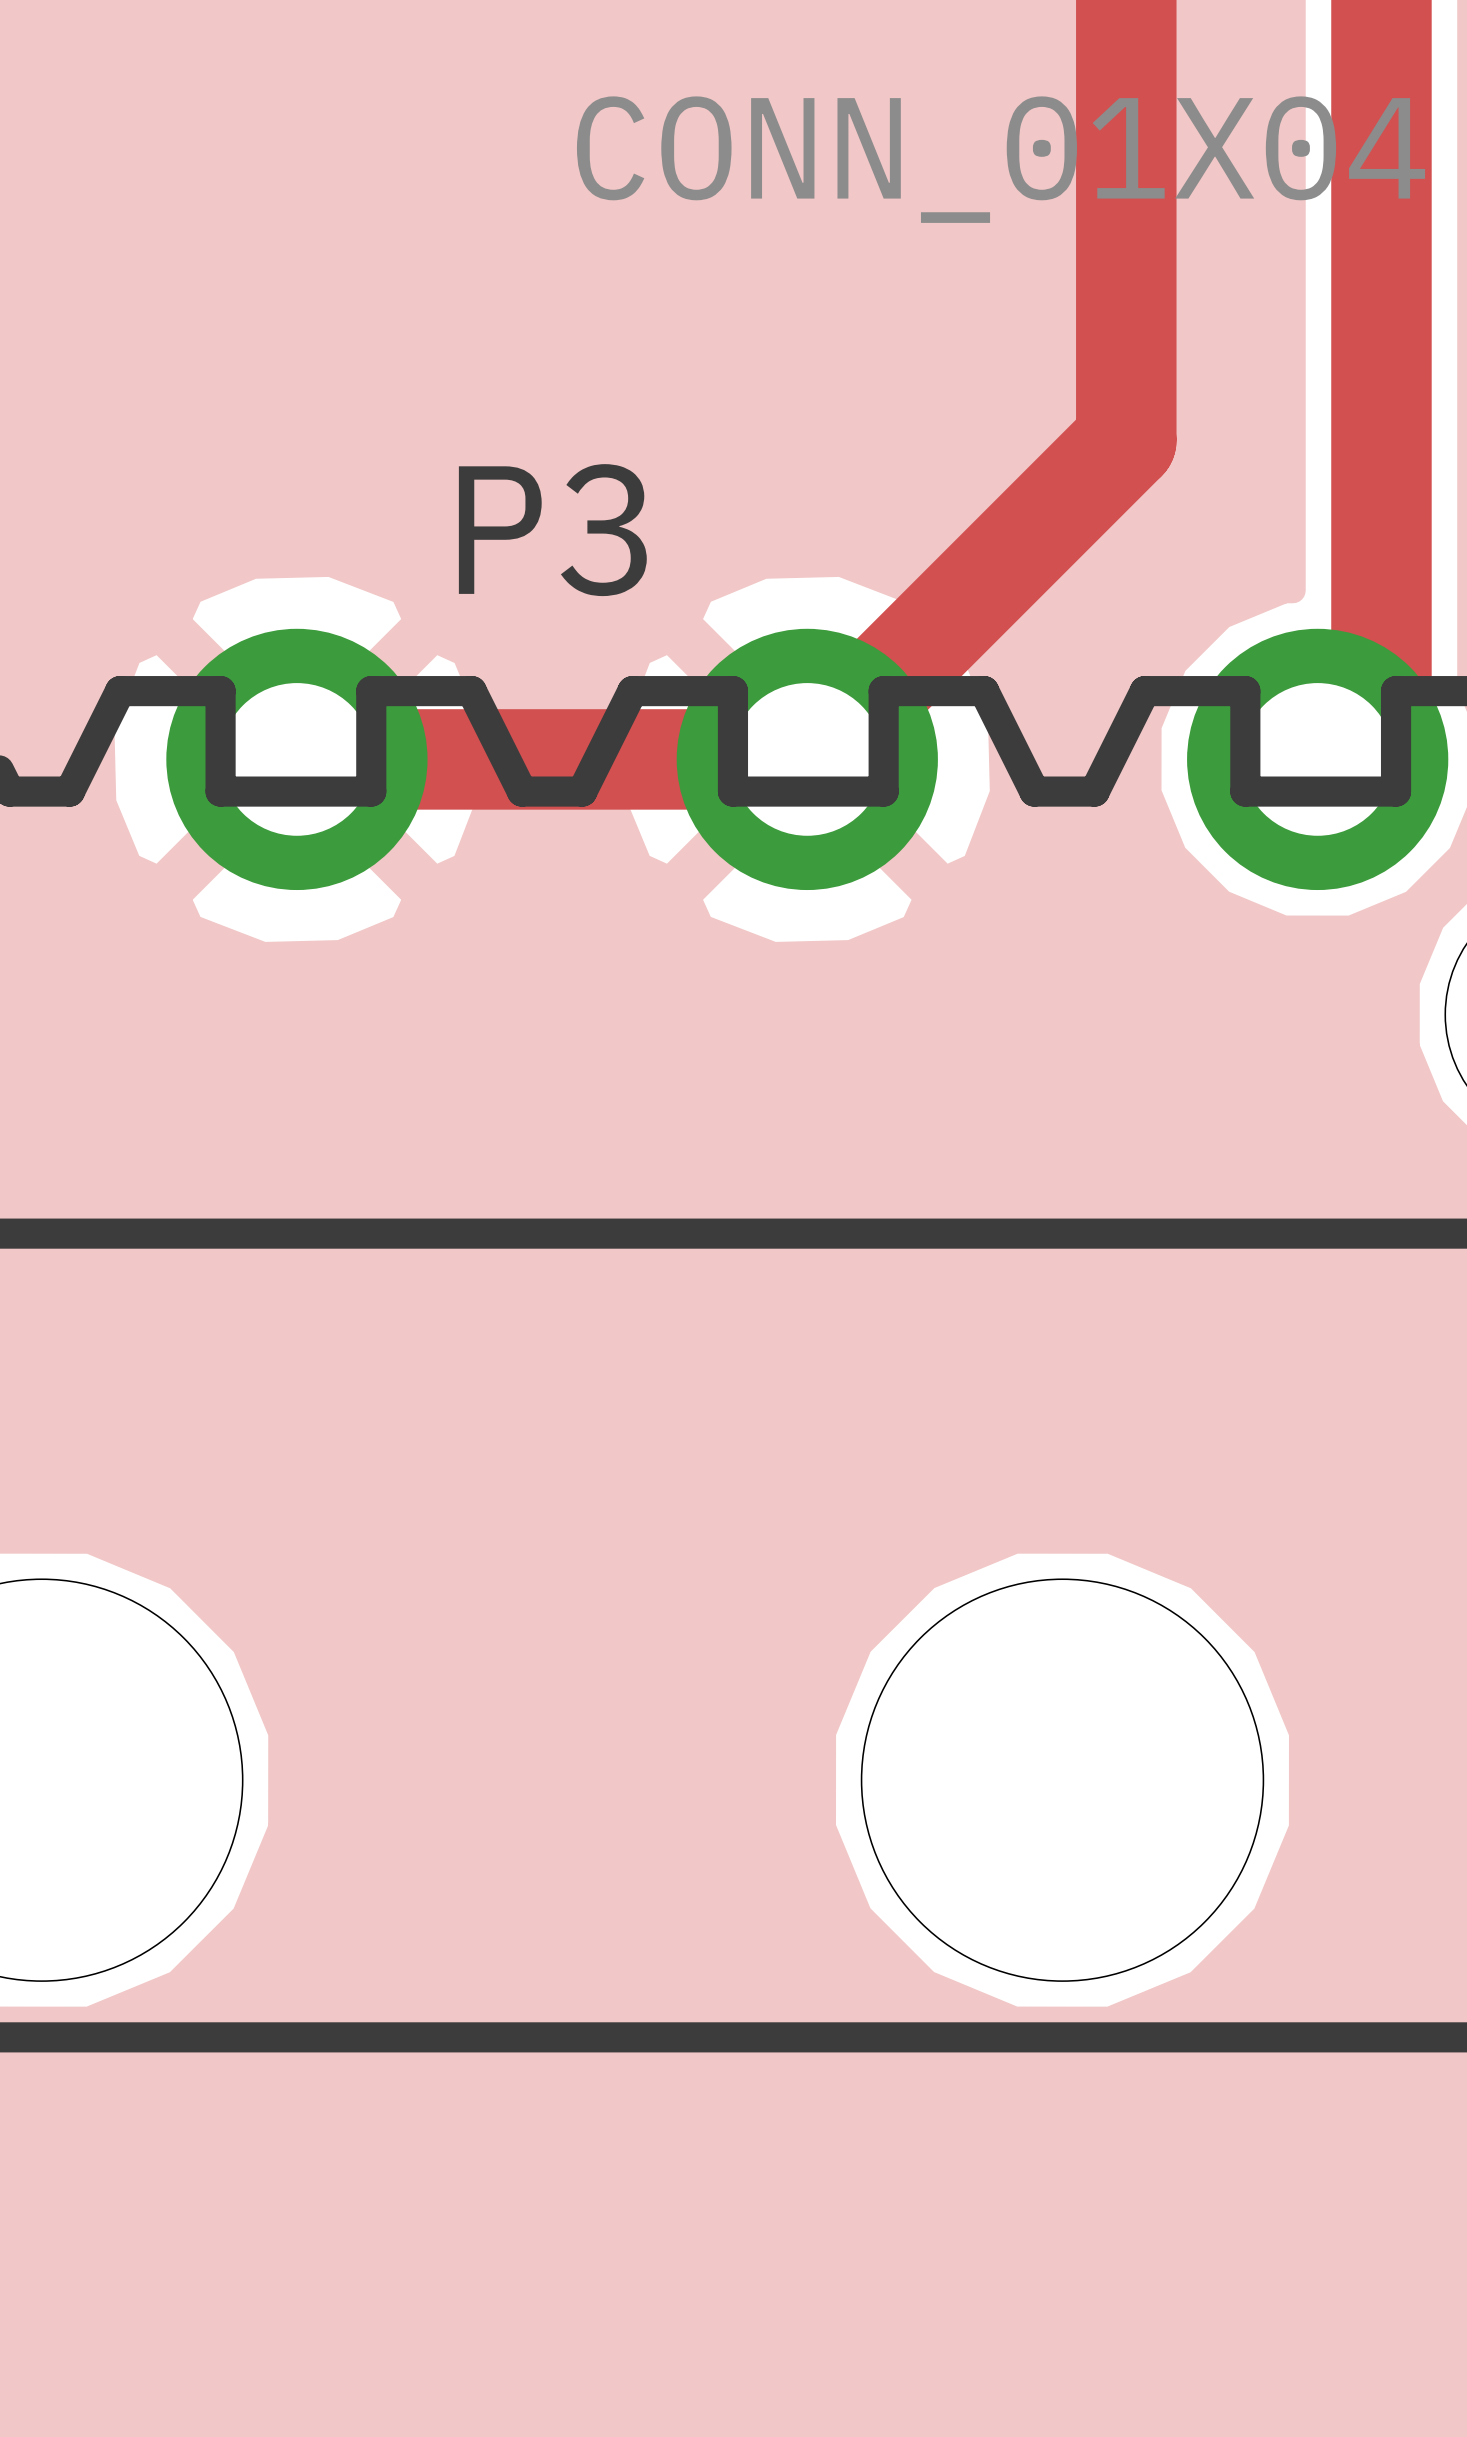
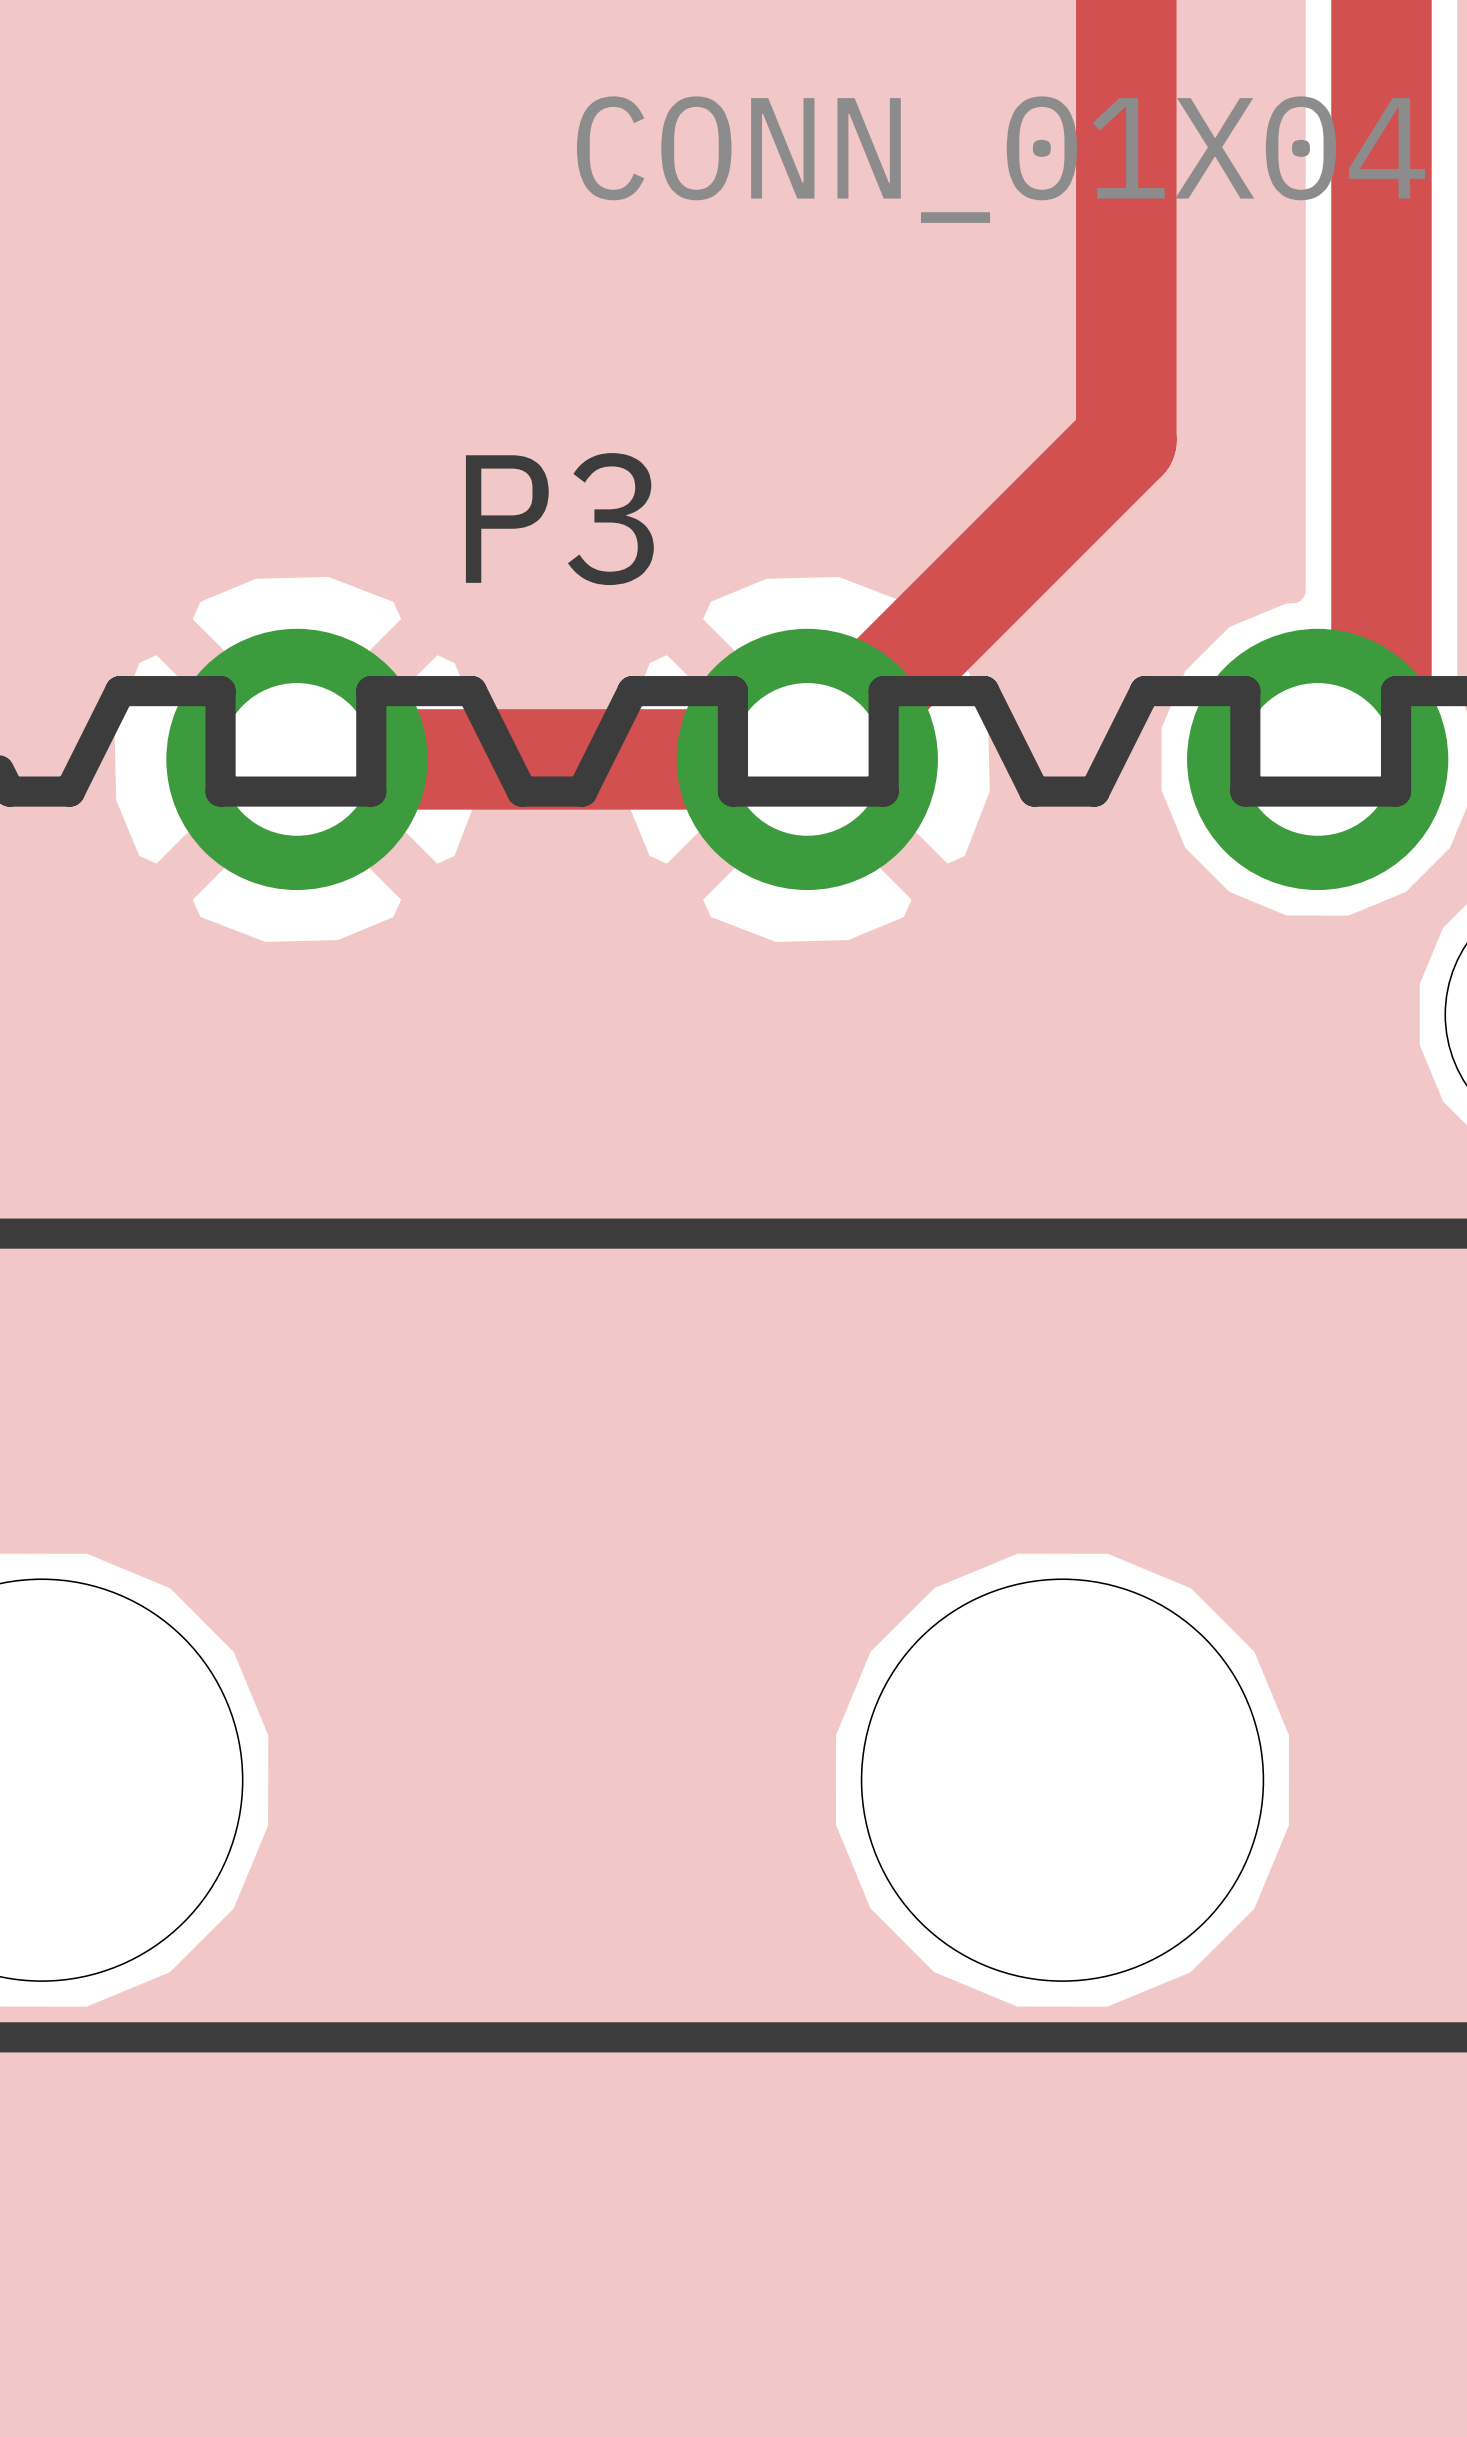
P3 name position: P3 (552, 530) -> P3 (559, 519)

